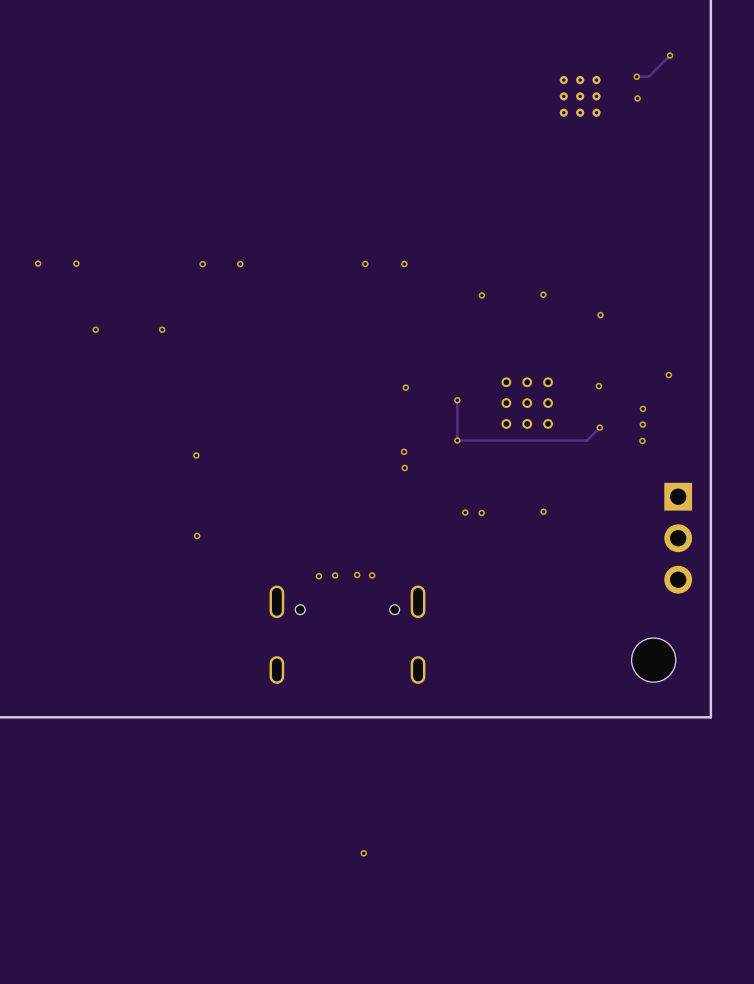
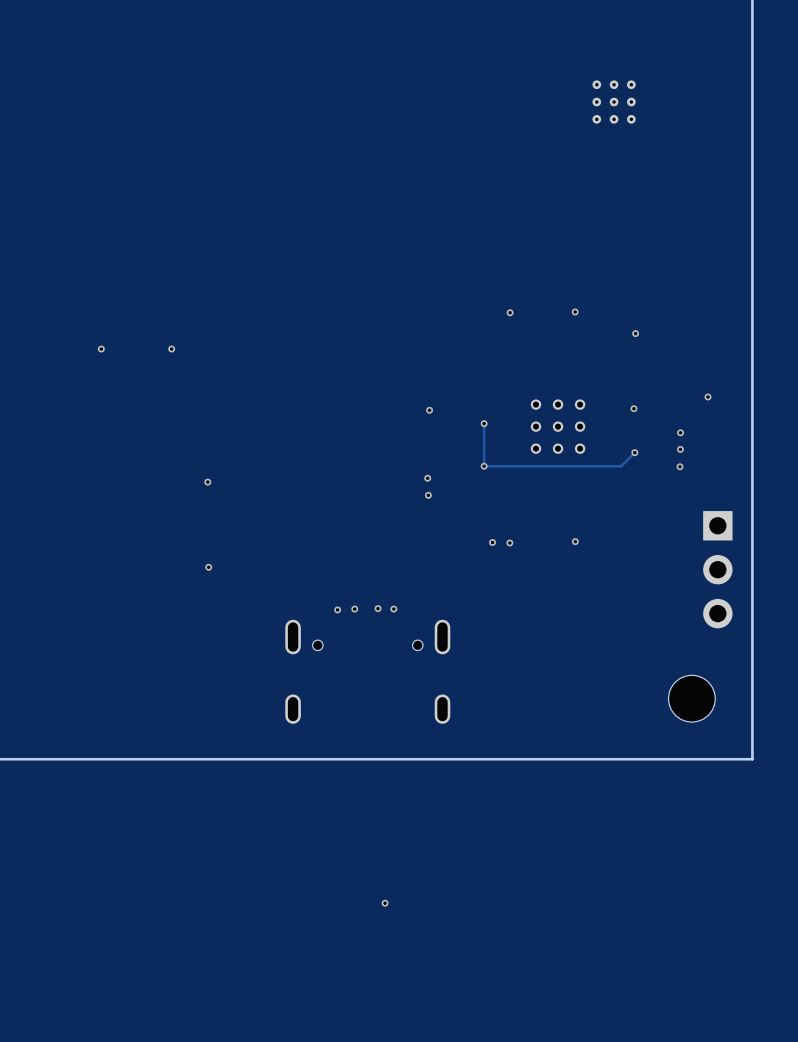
track: (670, 55) (648, 76) (636, 76) -> none
via: (670, 55) -> none
via: (636, 76) -> none
via: (637, 98) -> none
via: (38, 263) -> none
via: (76, 263) -> none
via: (365, 263) -> none
via: (202, 264) -> none
via: (240, 264) -> none
via: (404, 264) -> none

